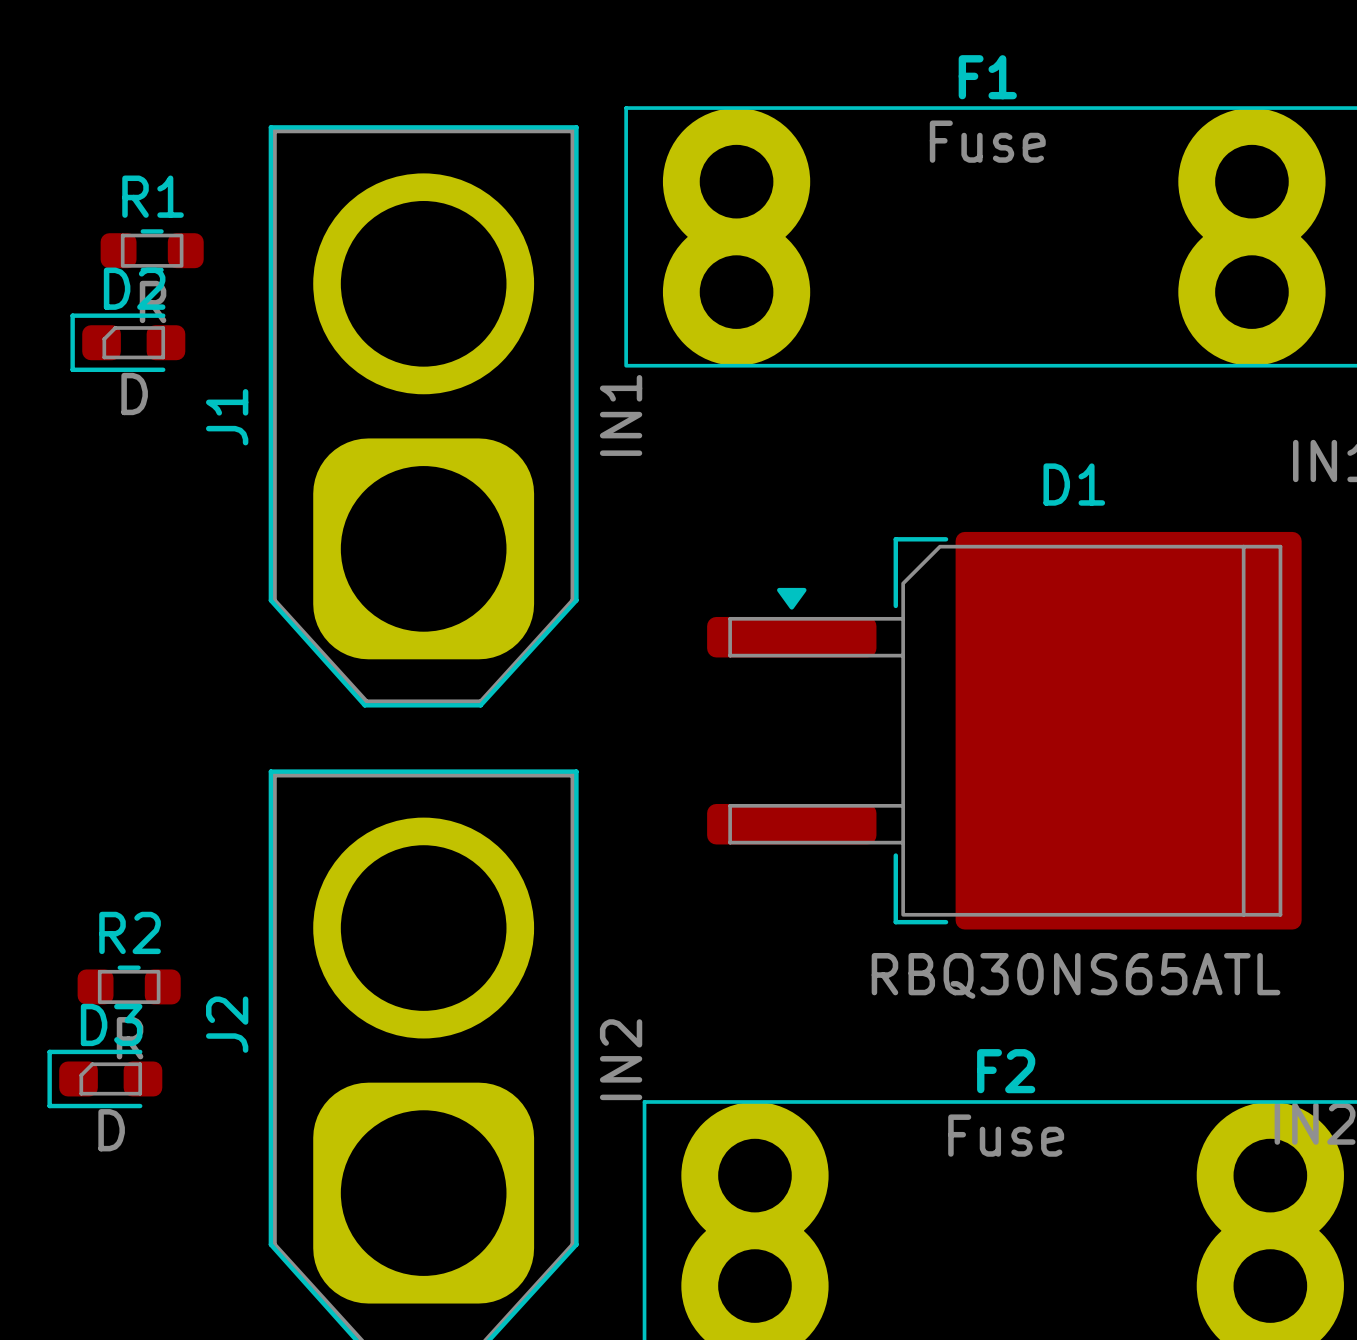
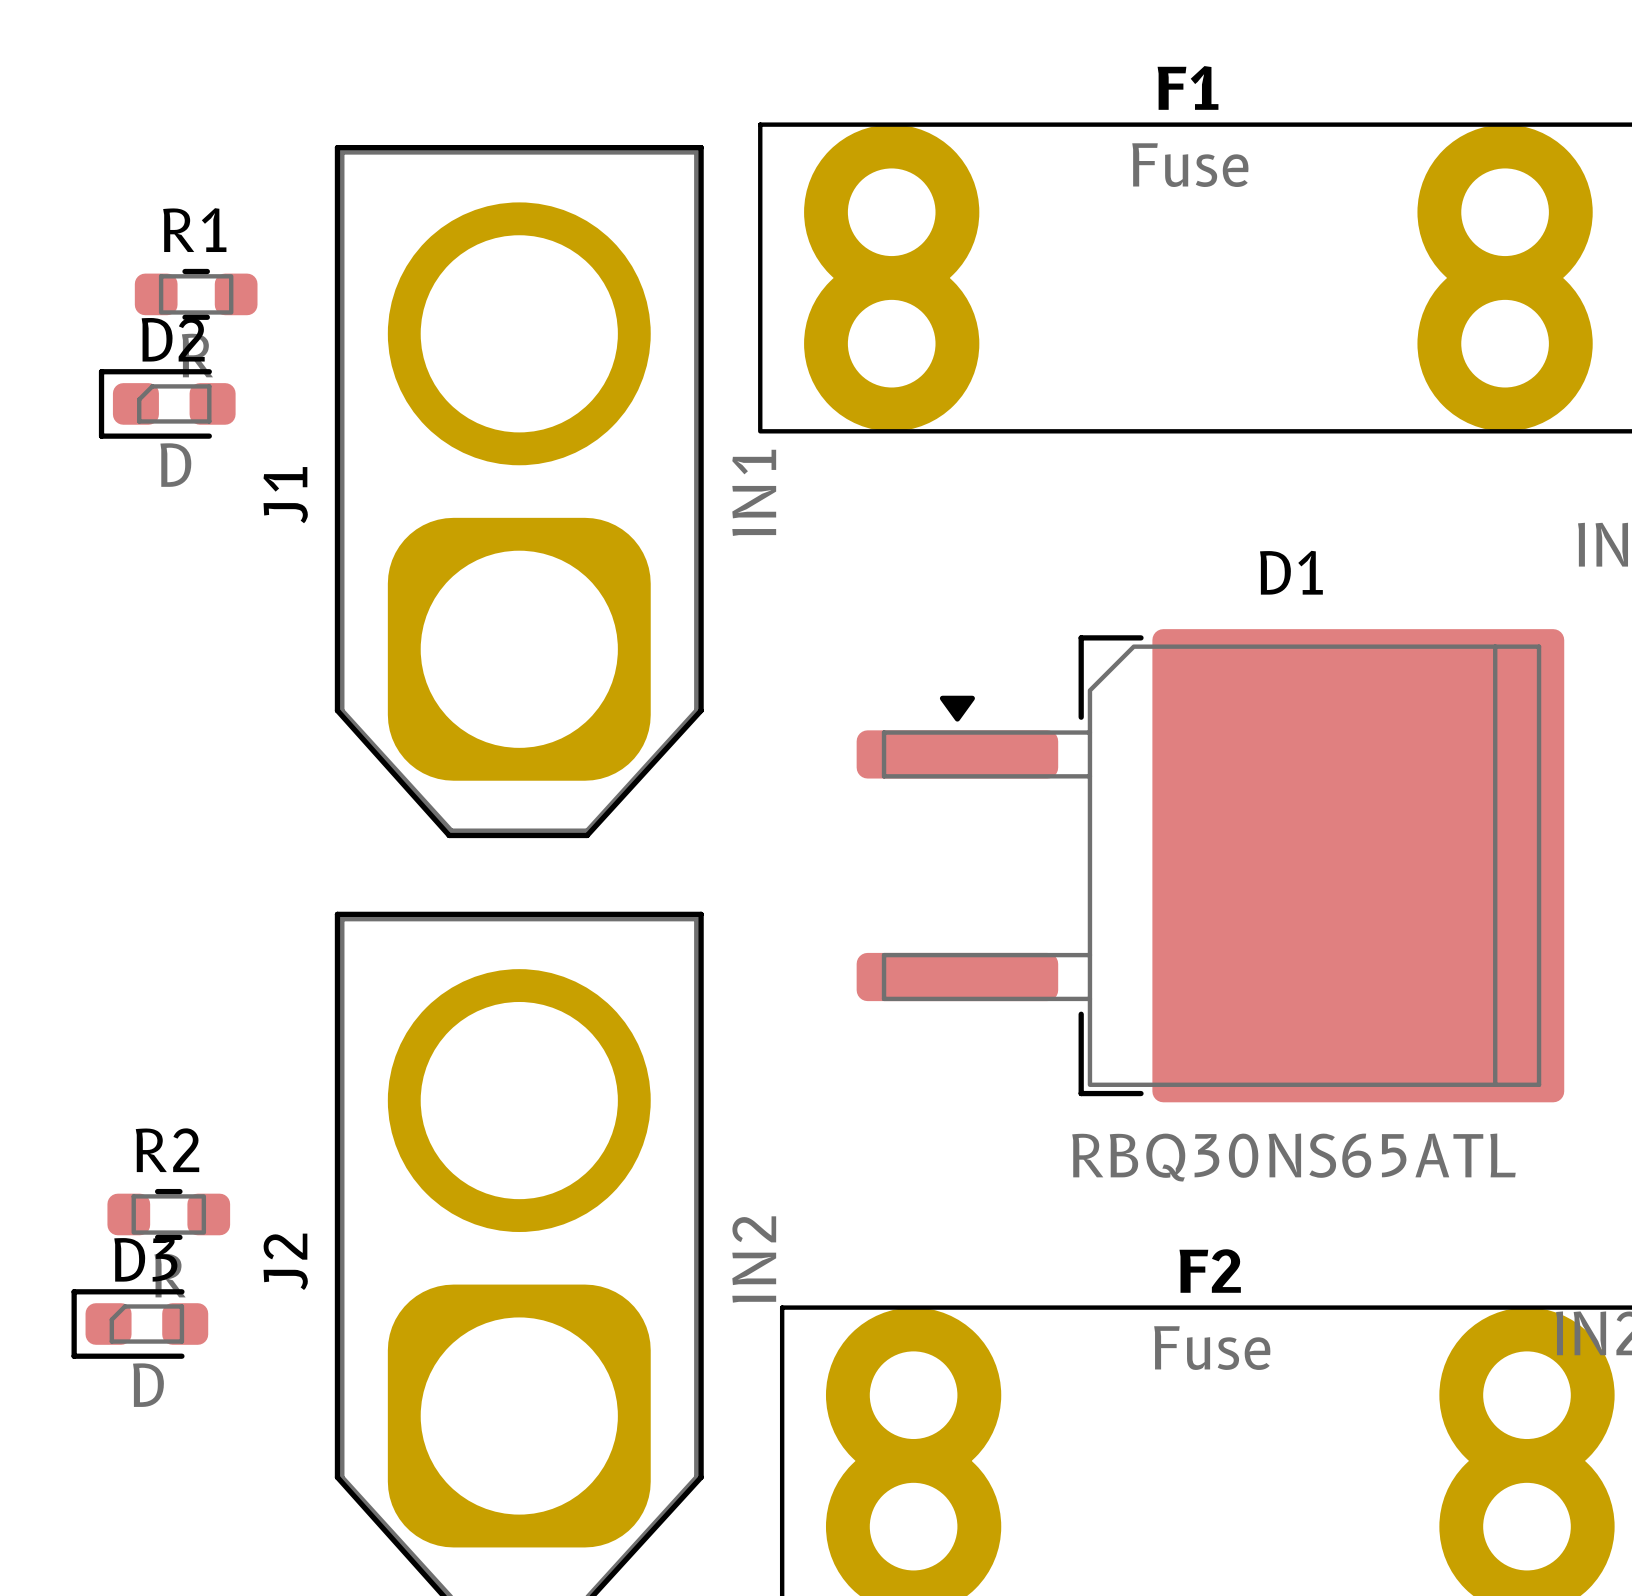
R2 position: (129, 986) -> (168, 1214)
J2 name position: J2 (227, 1024) -> J2 (285, 1261)
D3 position: (104, 1078) -> (139, 1324)

